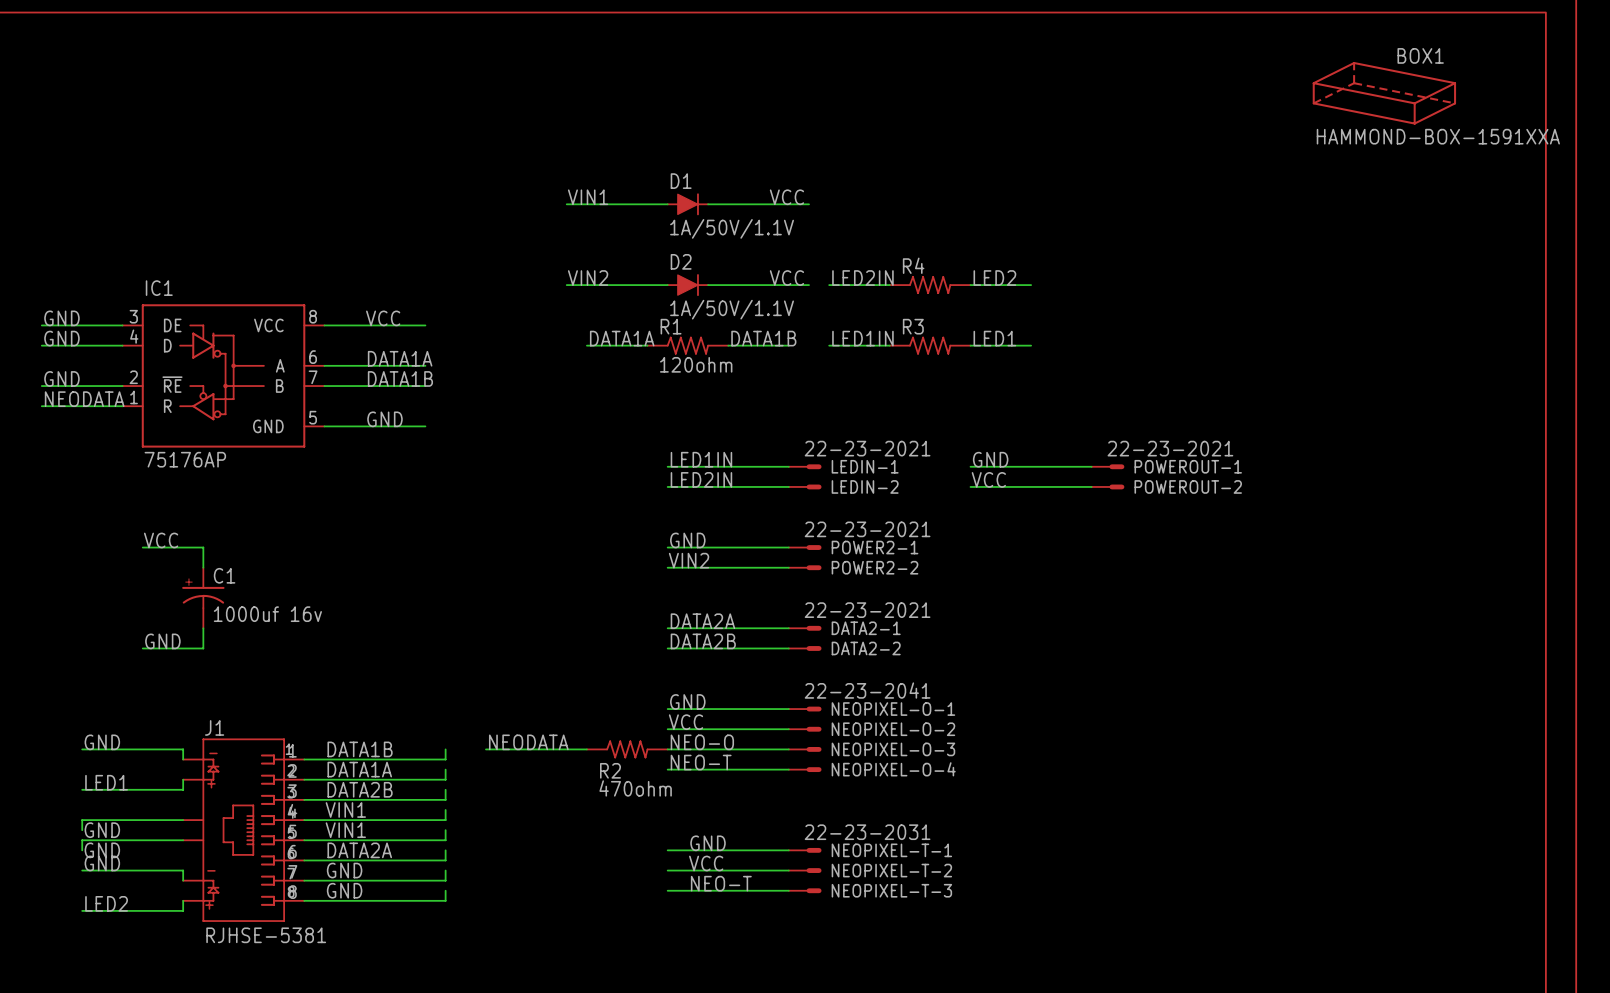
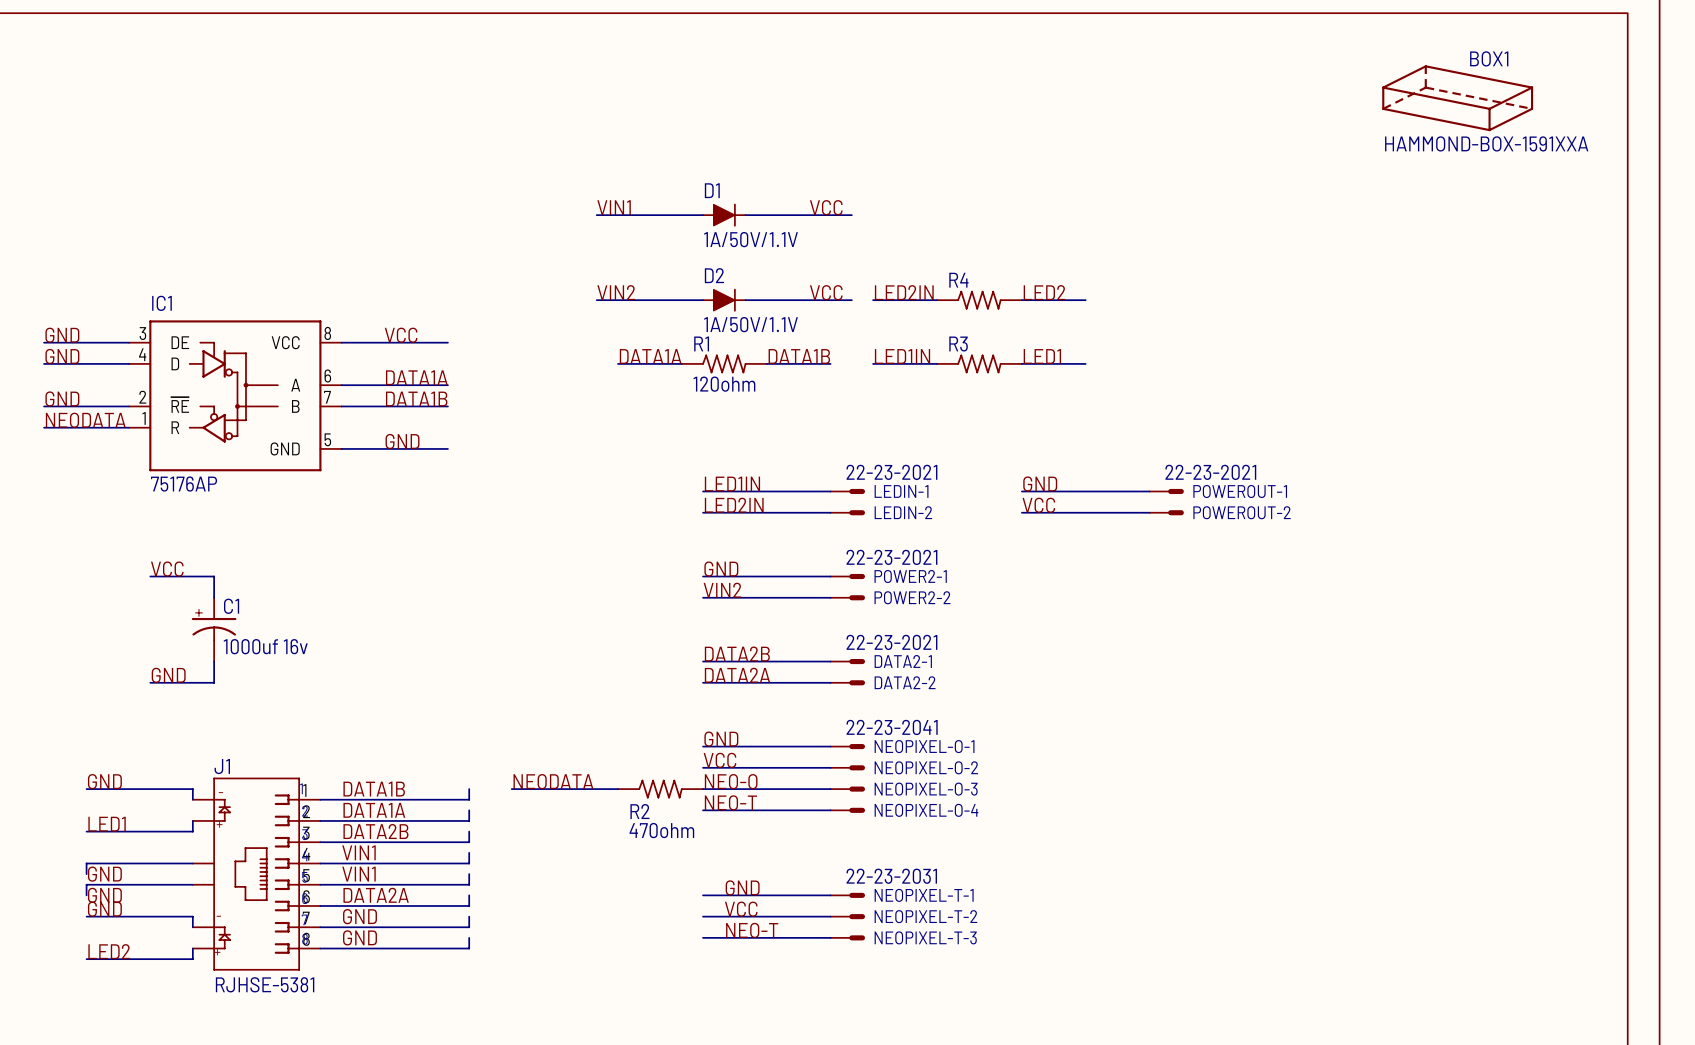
label: DATA2A (702, 621) -> DATA2B (737, 654)
label: DATA2B (703, 641) -> DATA2A (737, 675)

